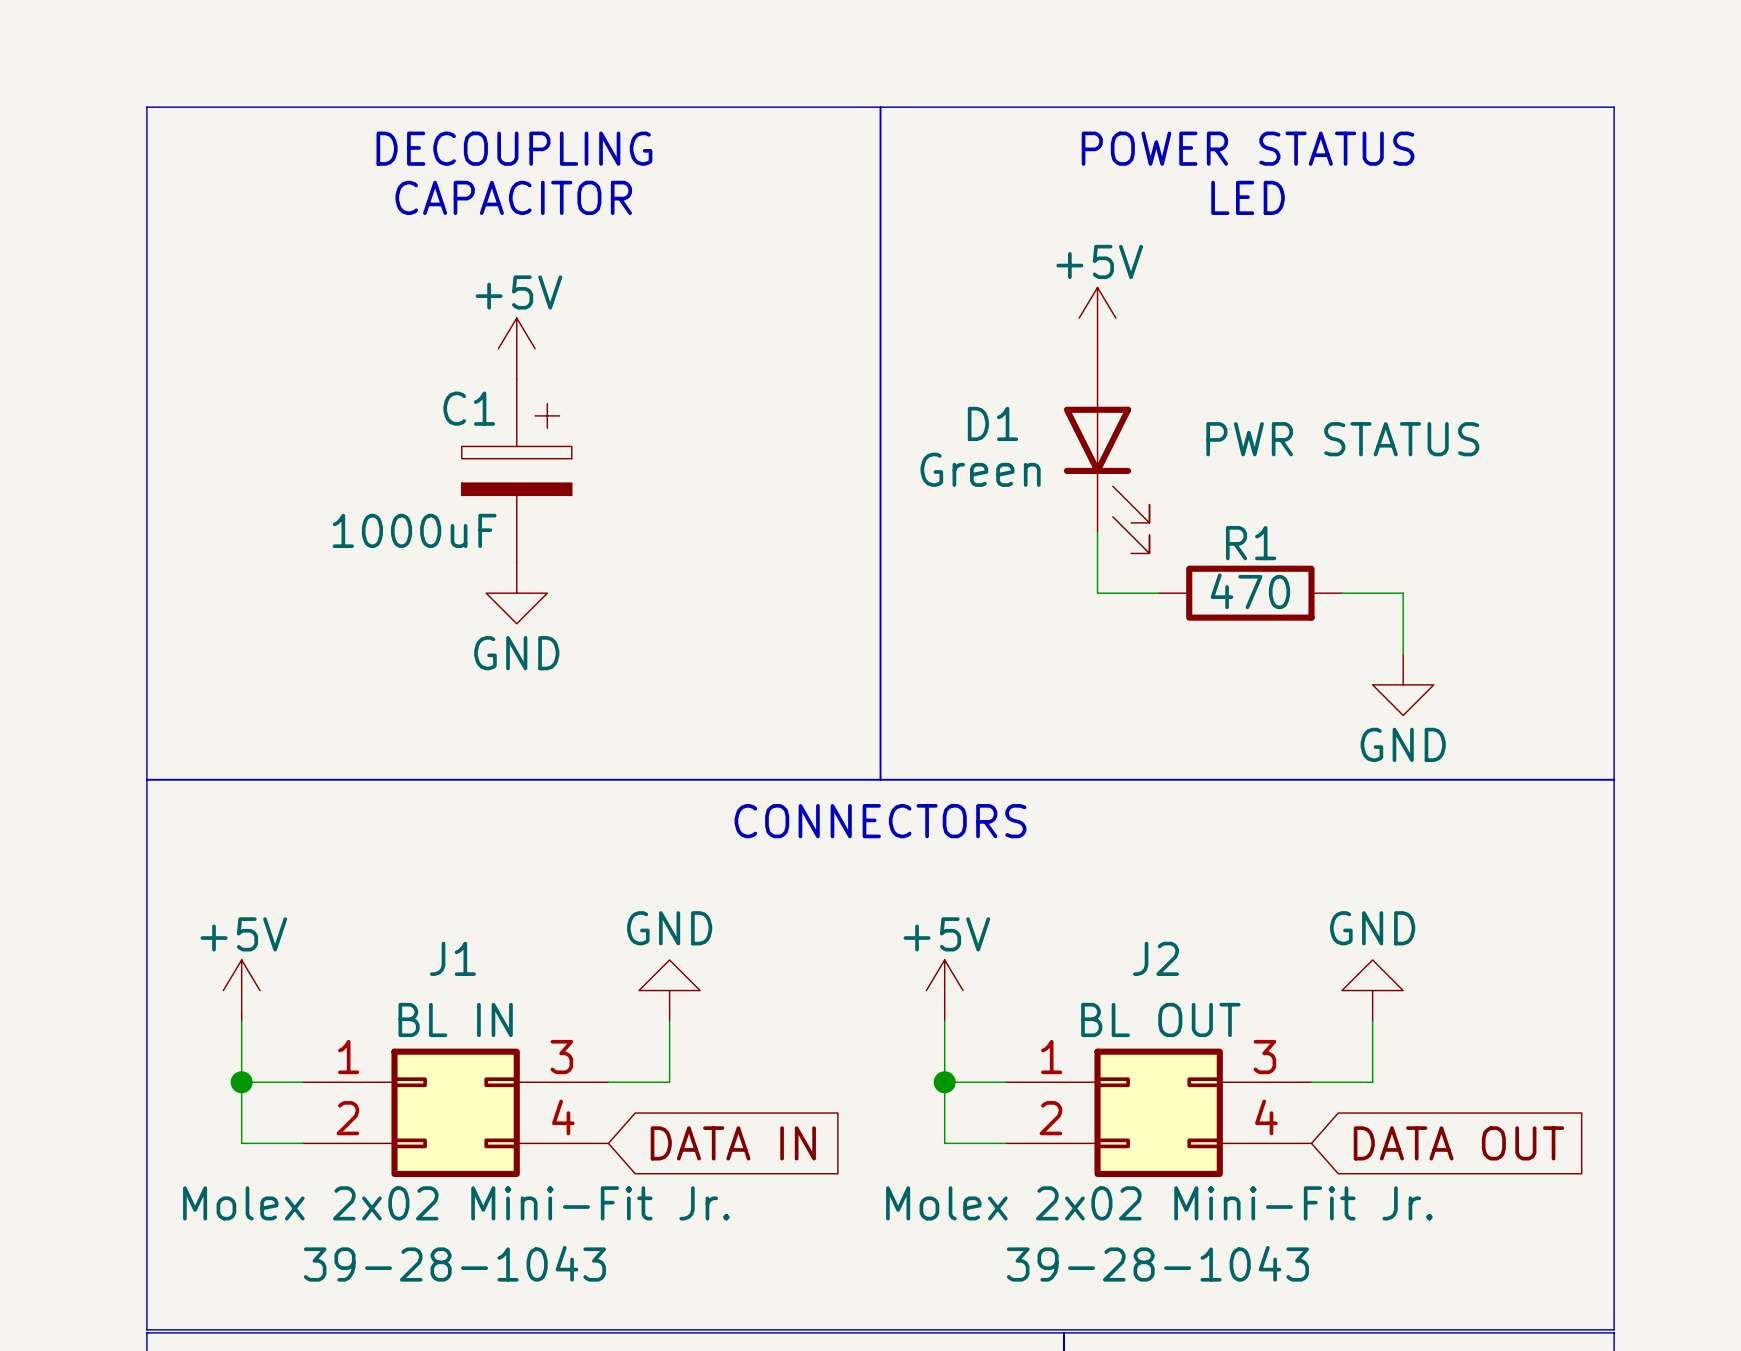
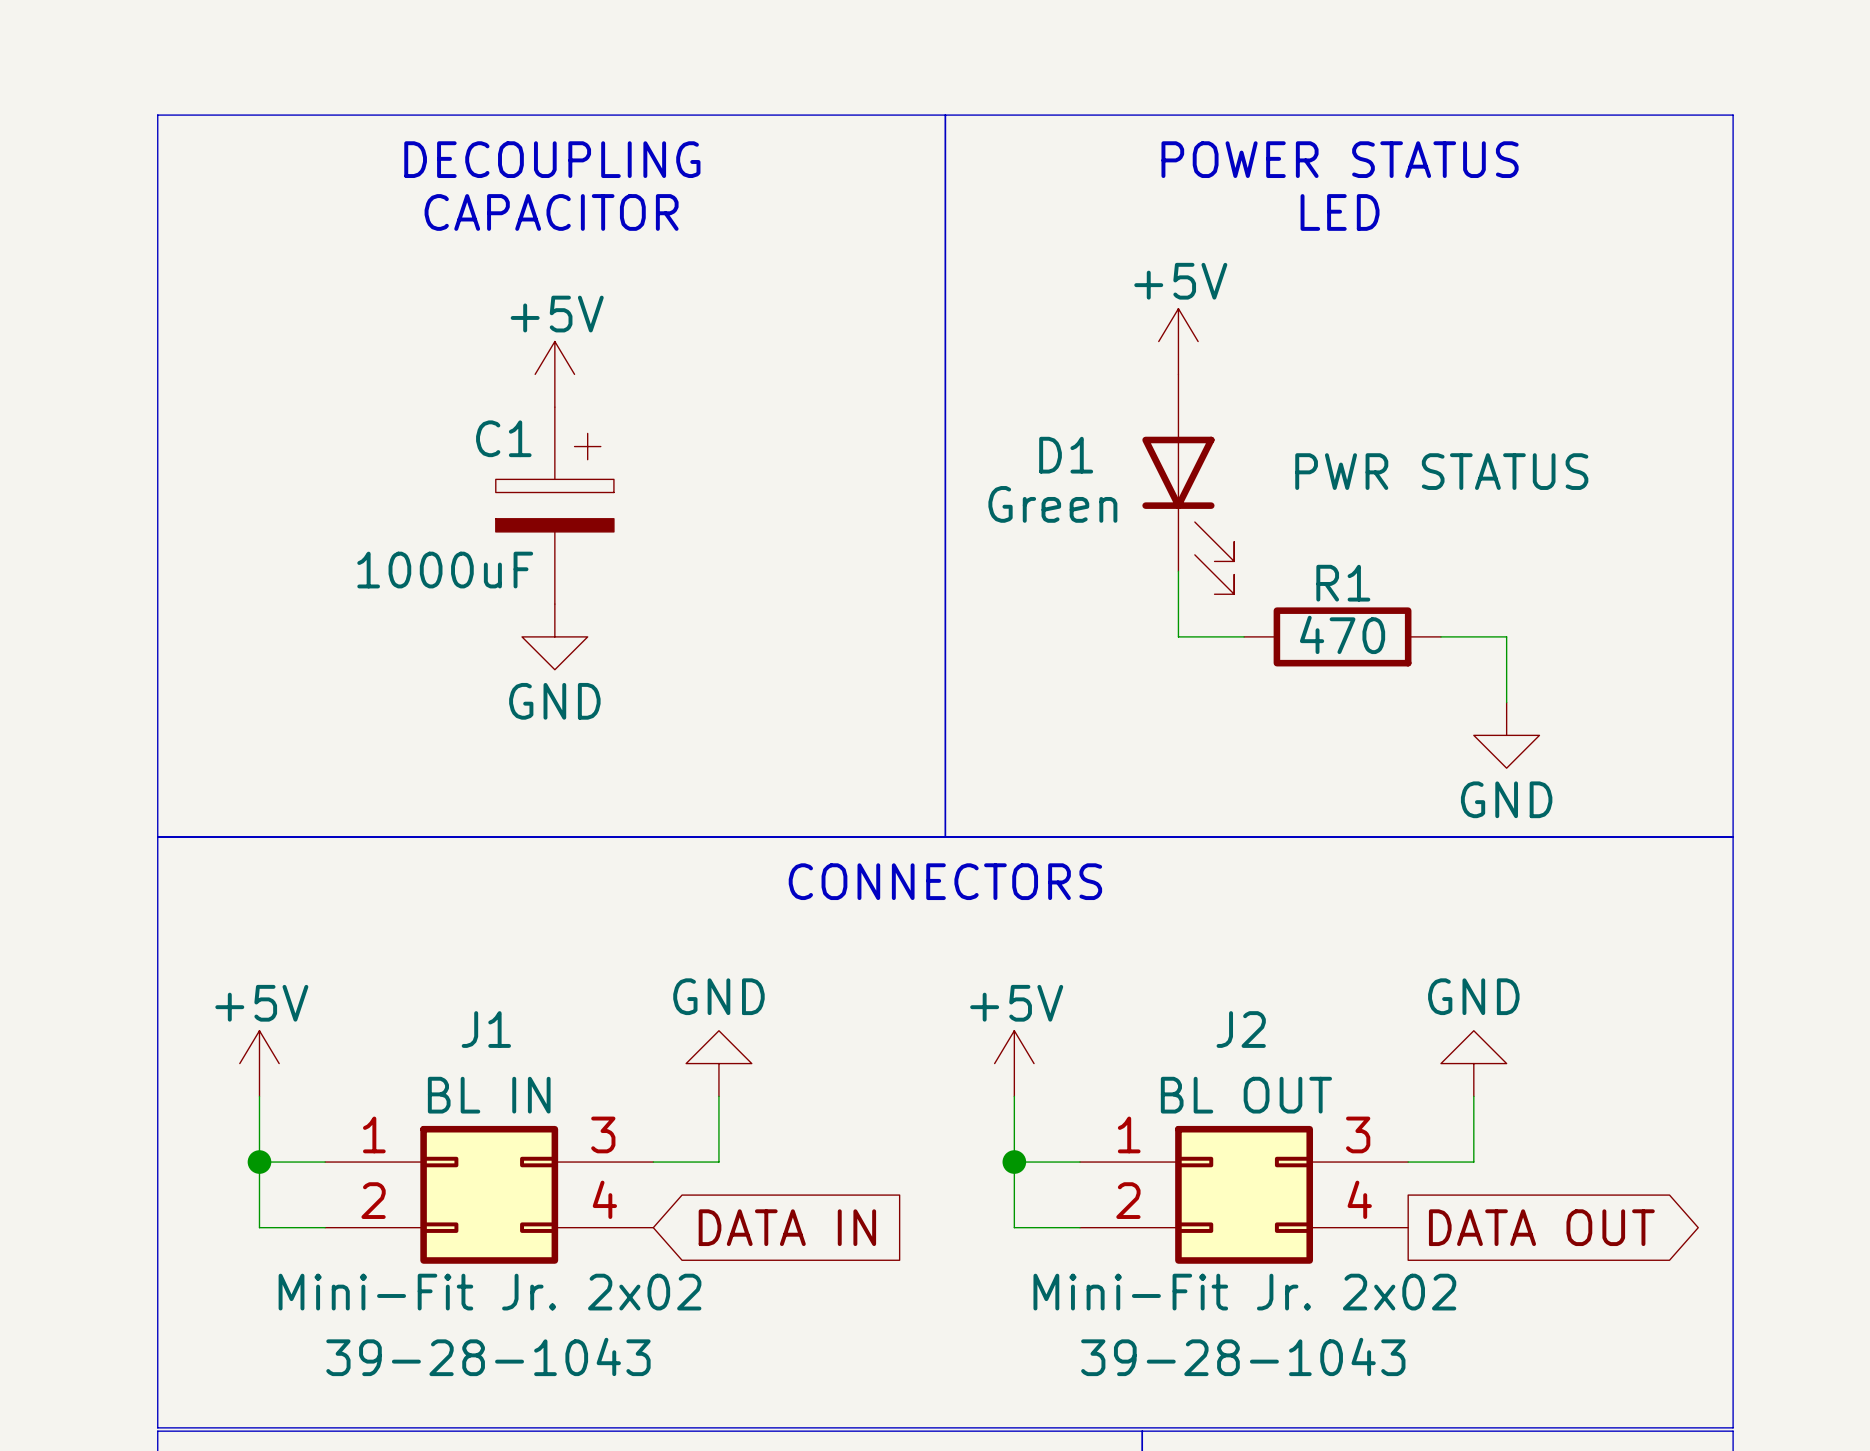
global label shape: input (1458, 1143) -> output (1541, 1227)
J1 value: Molex 2x02 Mini-Fit Jr. (456, 1203) -> Mini-Fit Jr. 2x02 (490, 1292)
J2 value: Molex 2x02 Mini-Fit Jr. (1159, 1203) -> Mini-Fit Jr. 2x02 (1244, 1292)

